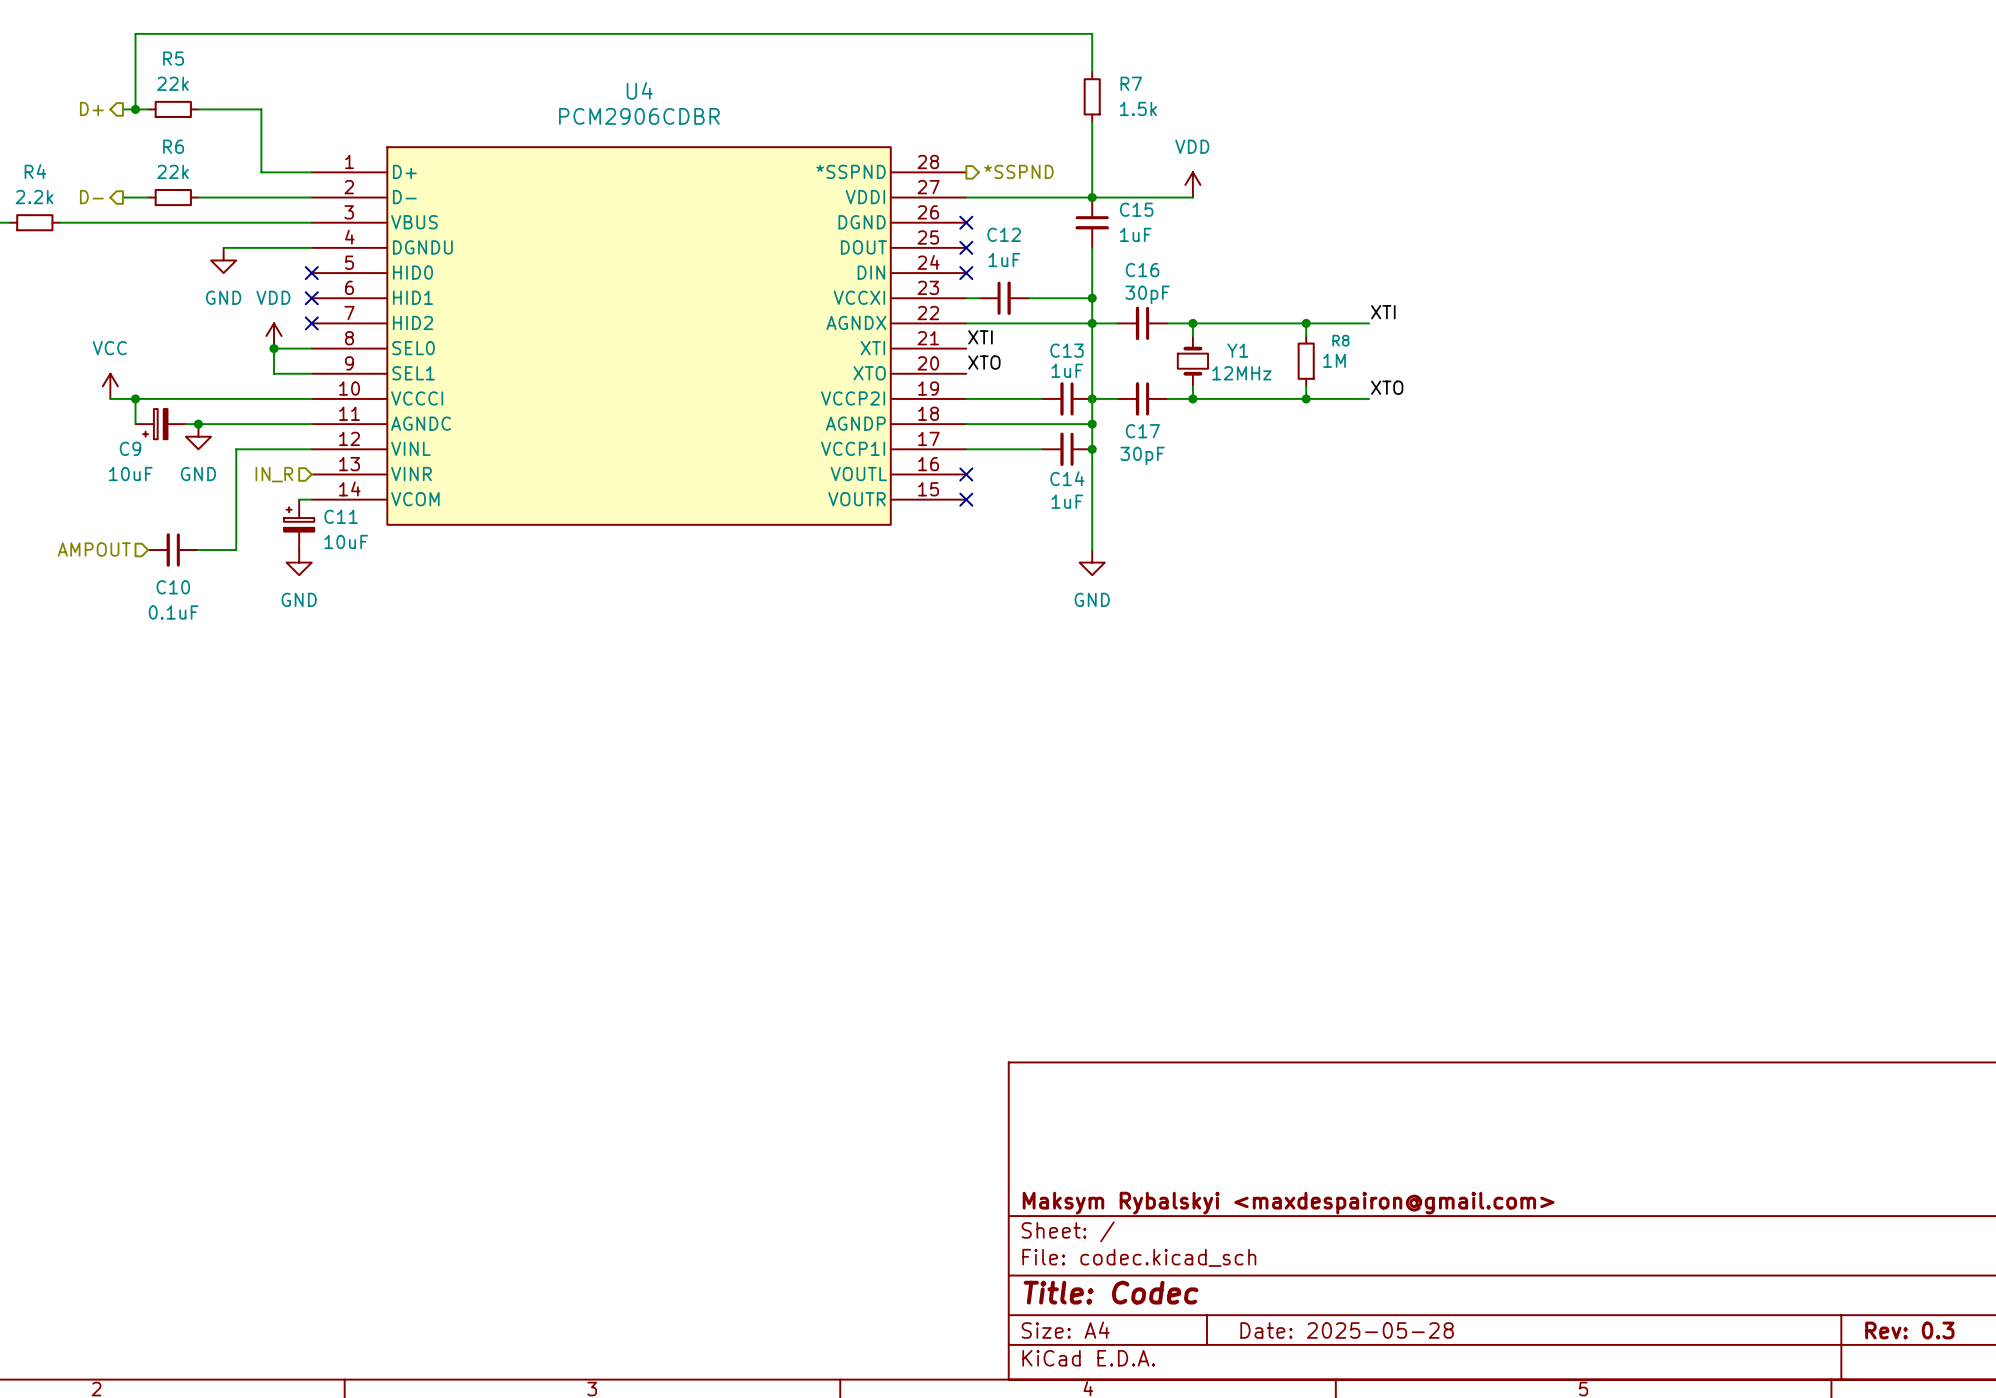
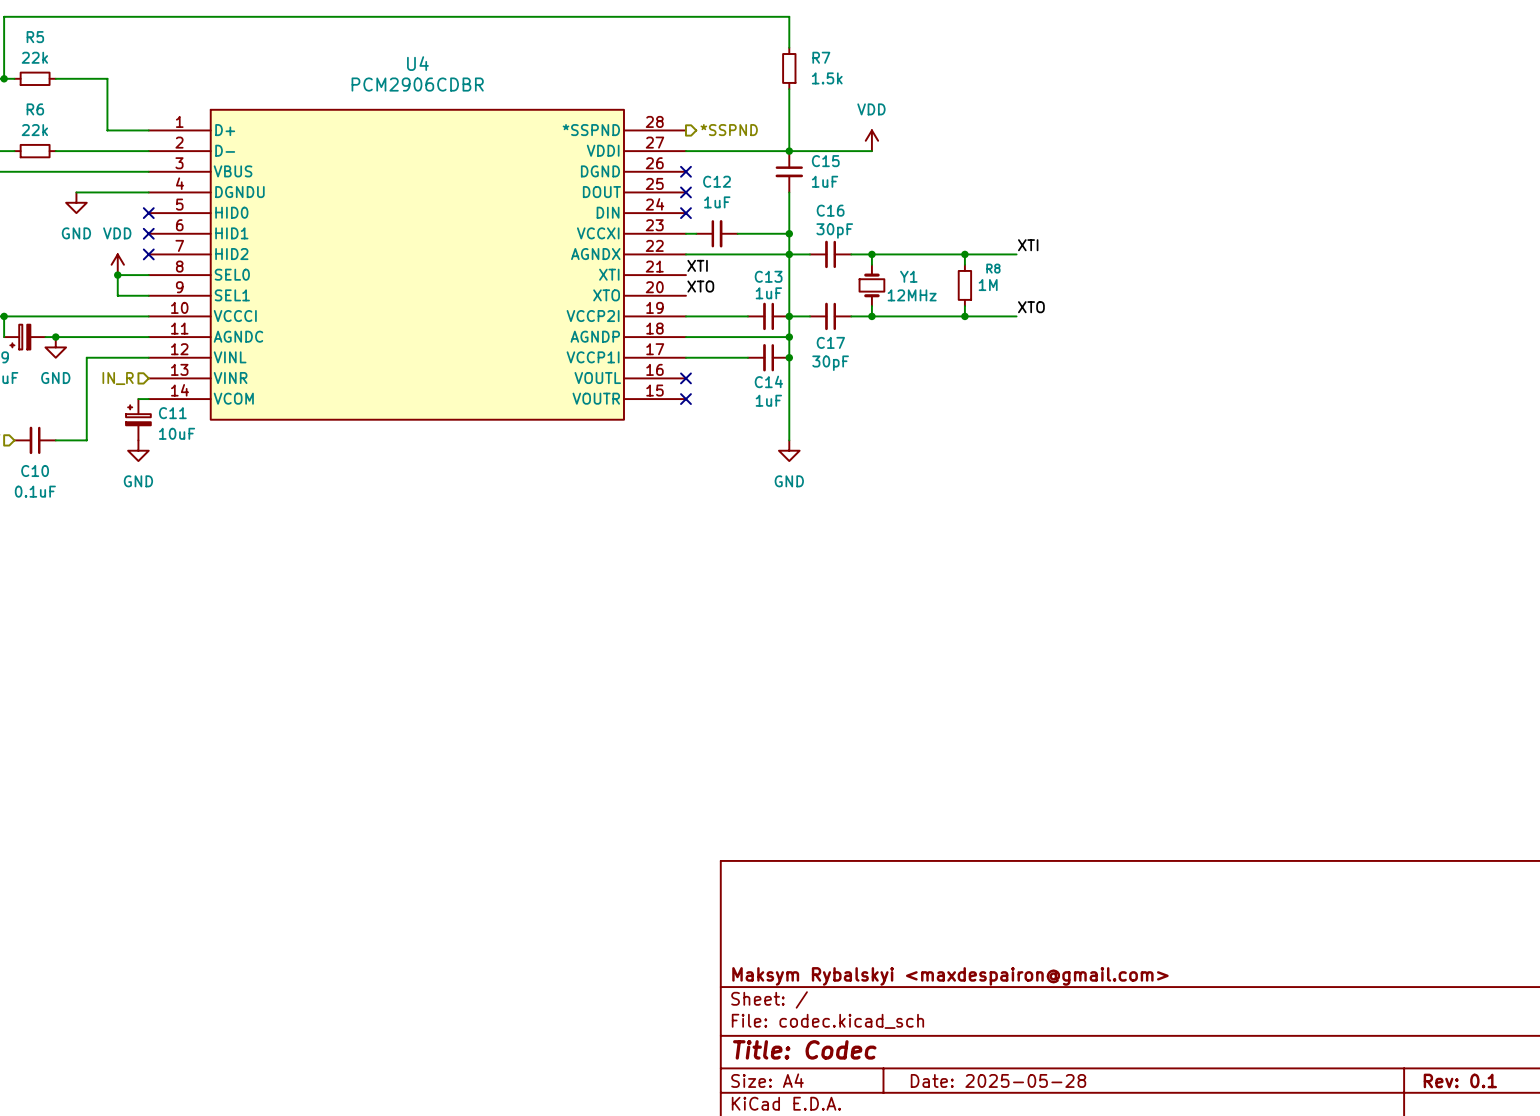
title block: Rev: 0.3 (1909, 1330) -> Rev: 0.1 (1460, 1080)

